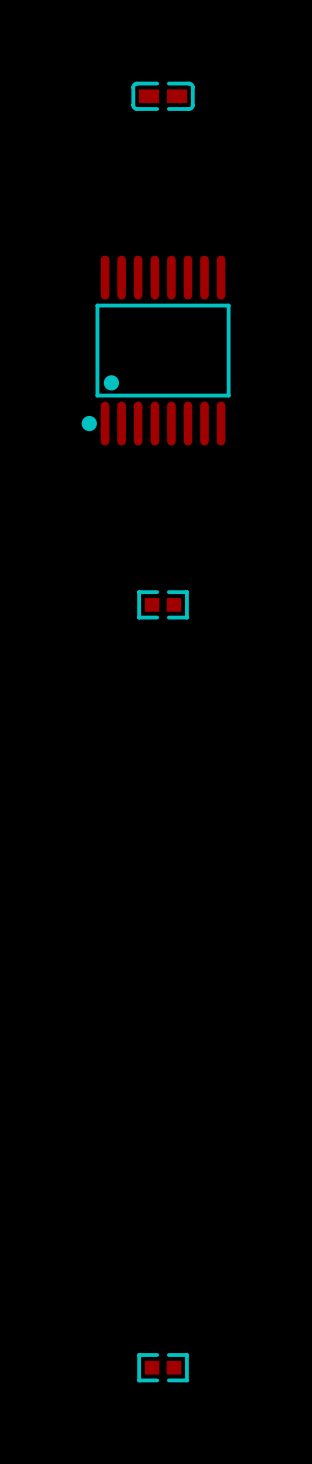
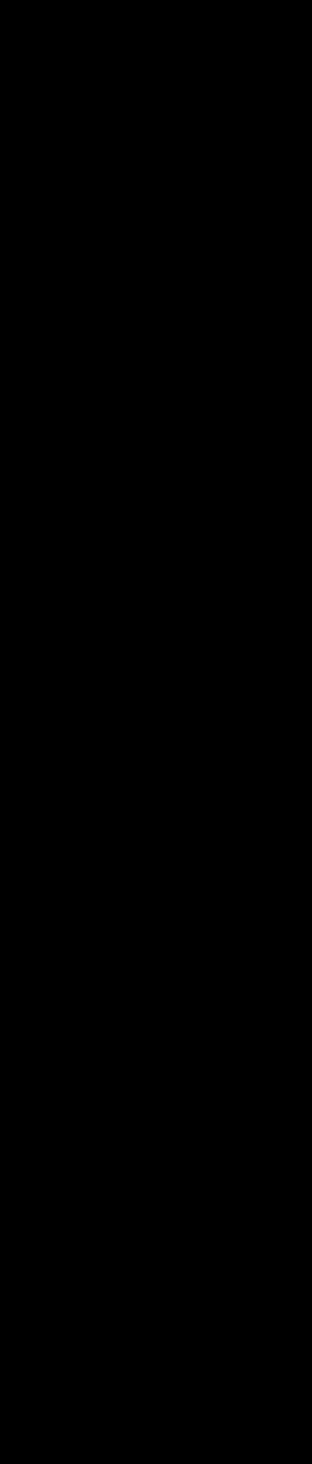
part: (163, 96) -> none
part: (156, 350) -> none
part: (163, 604) -> none
part: (163, 1367) -> none

